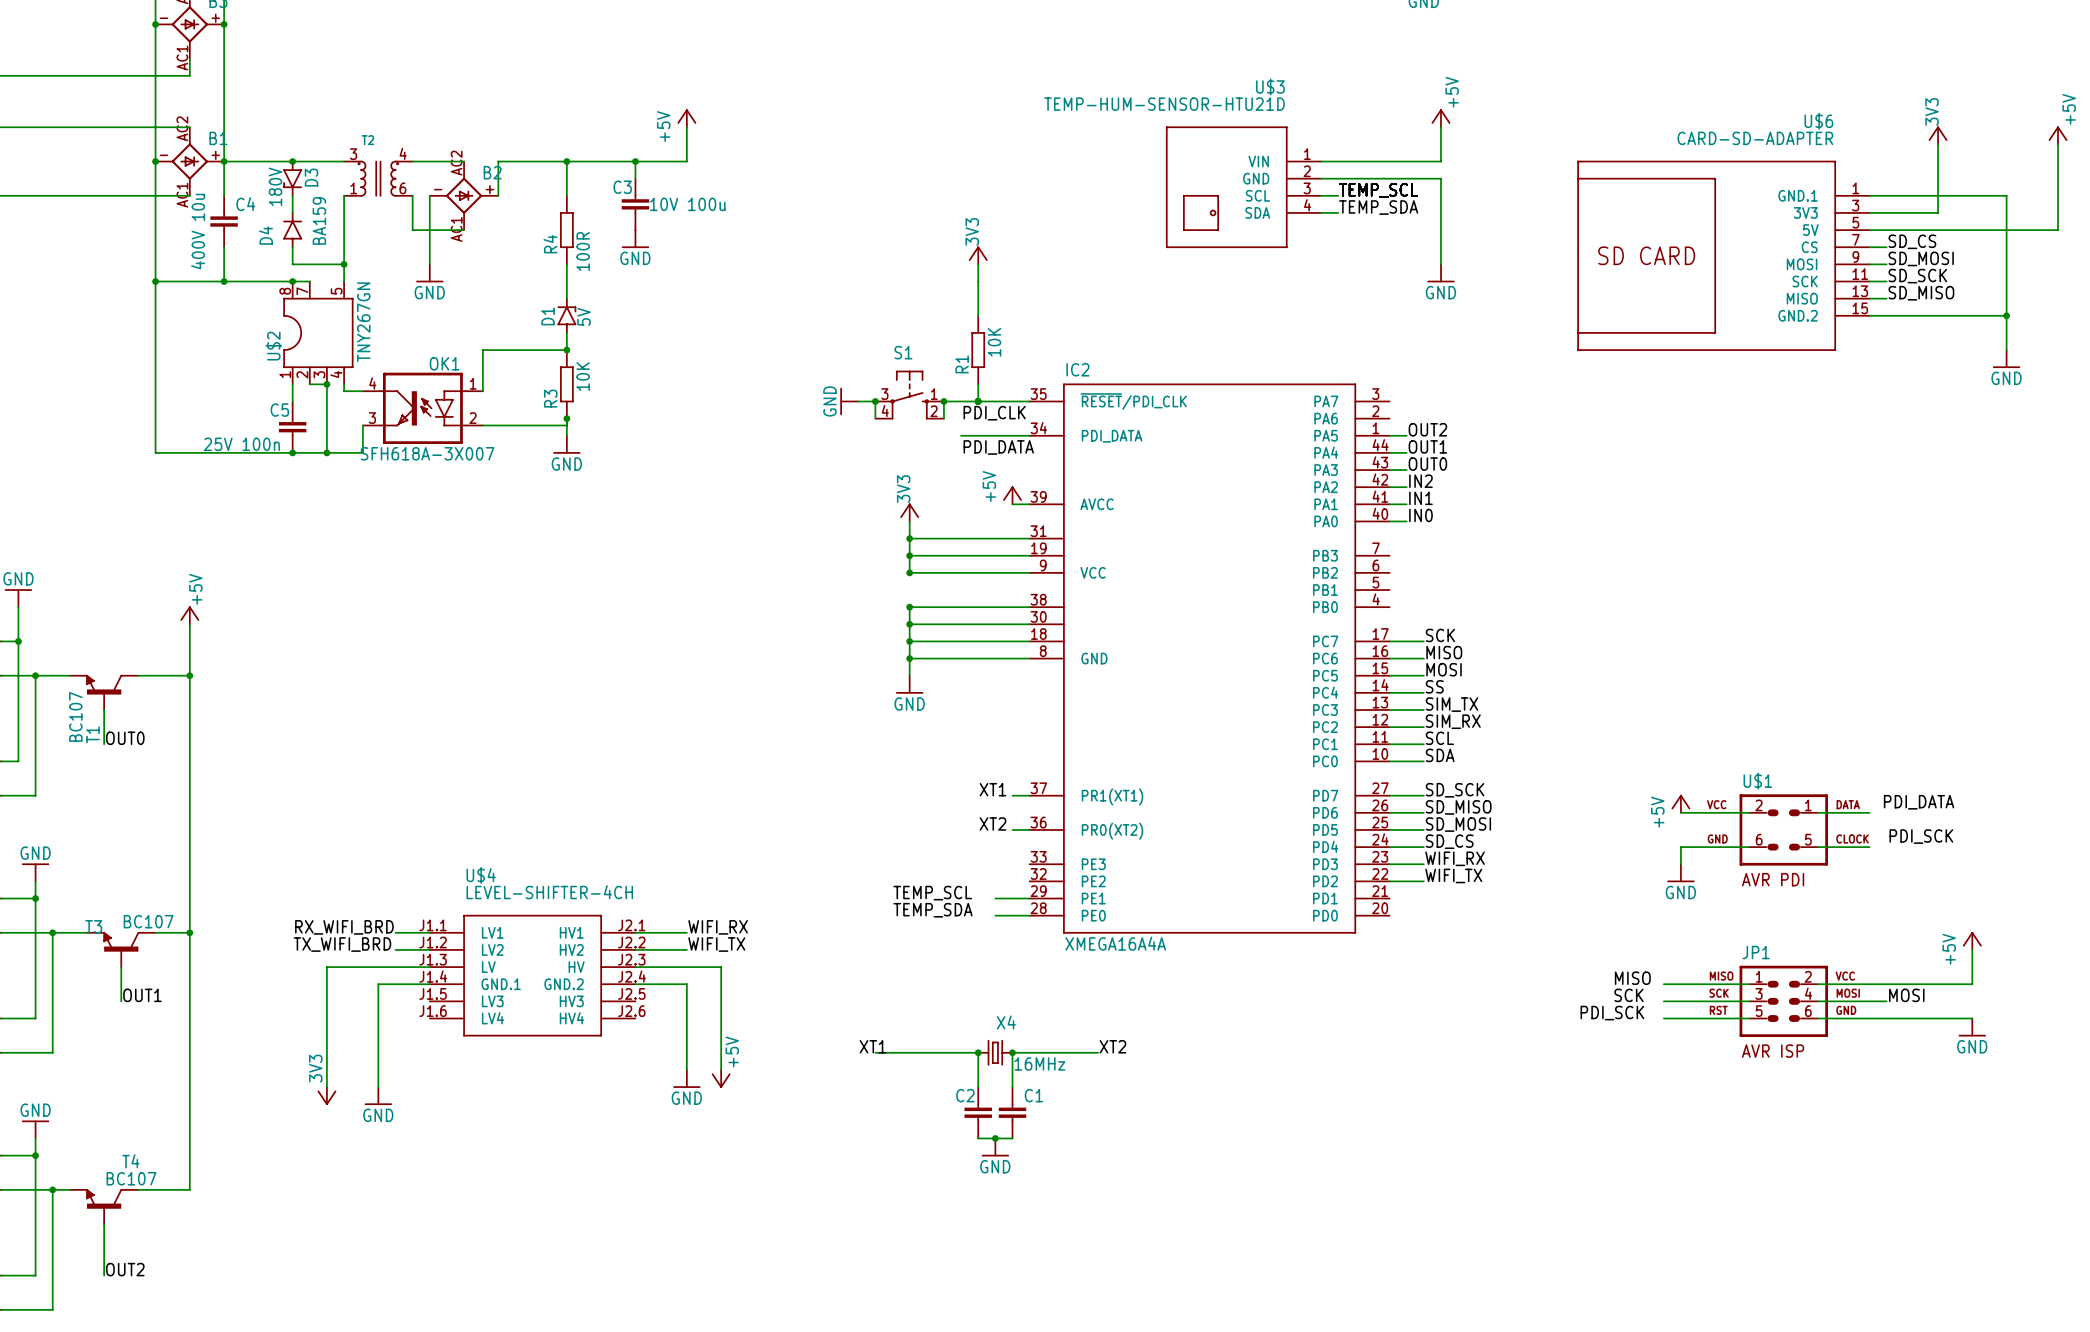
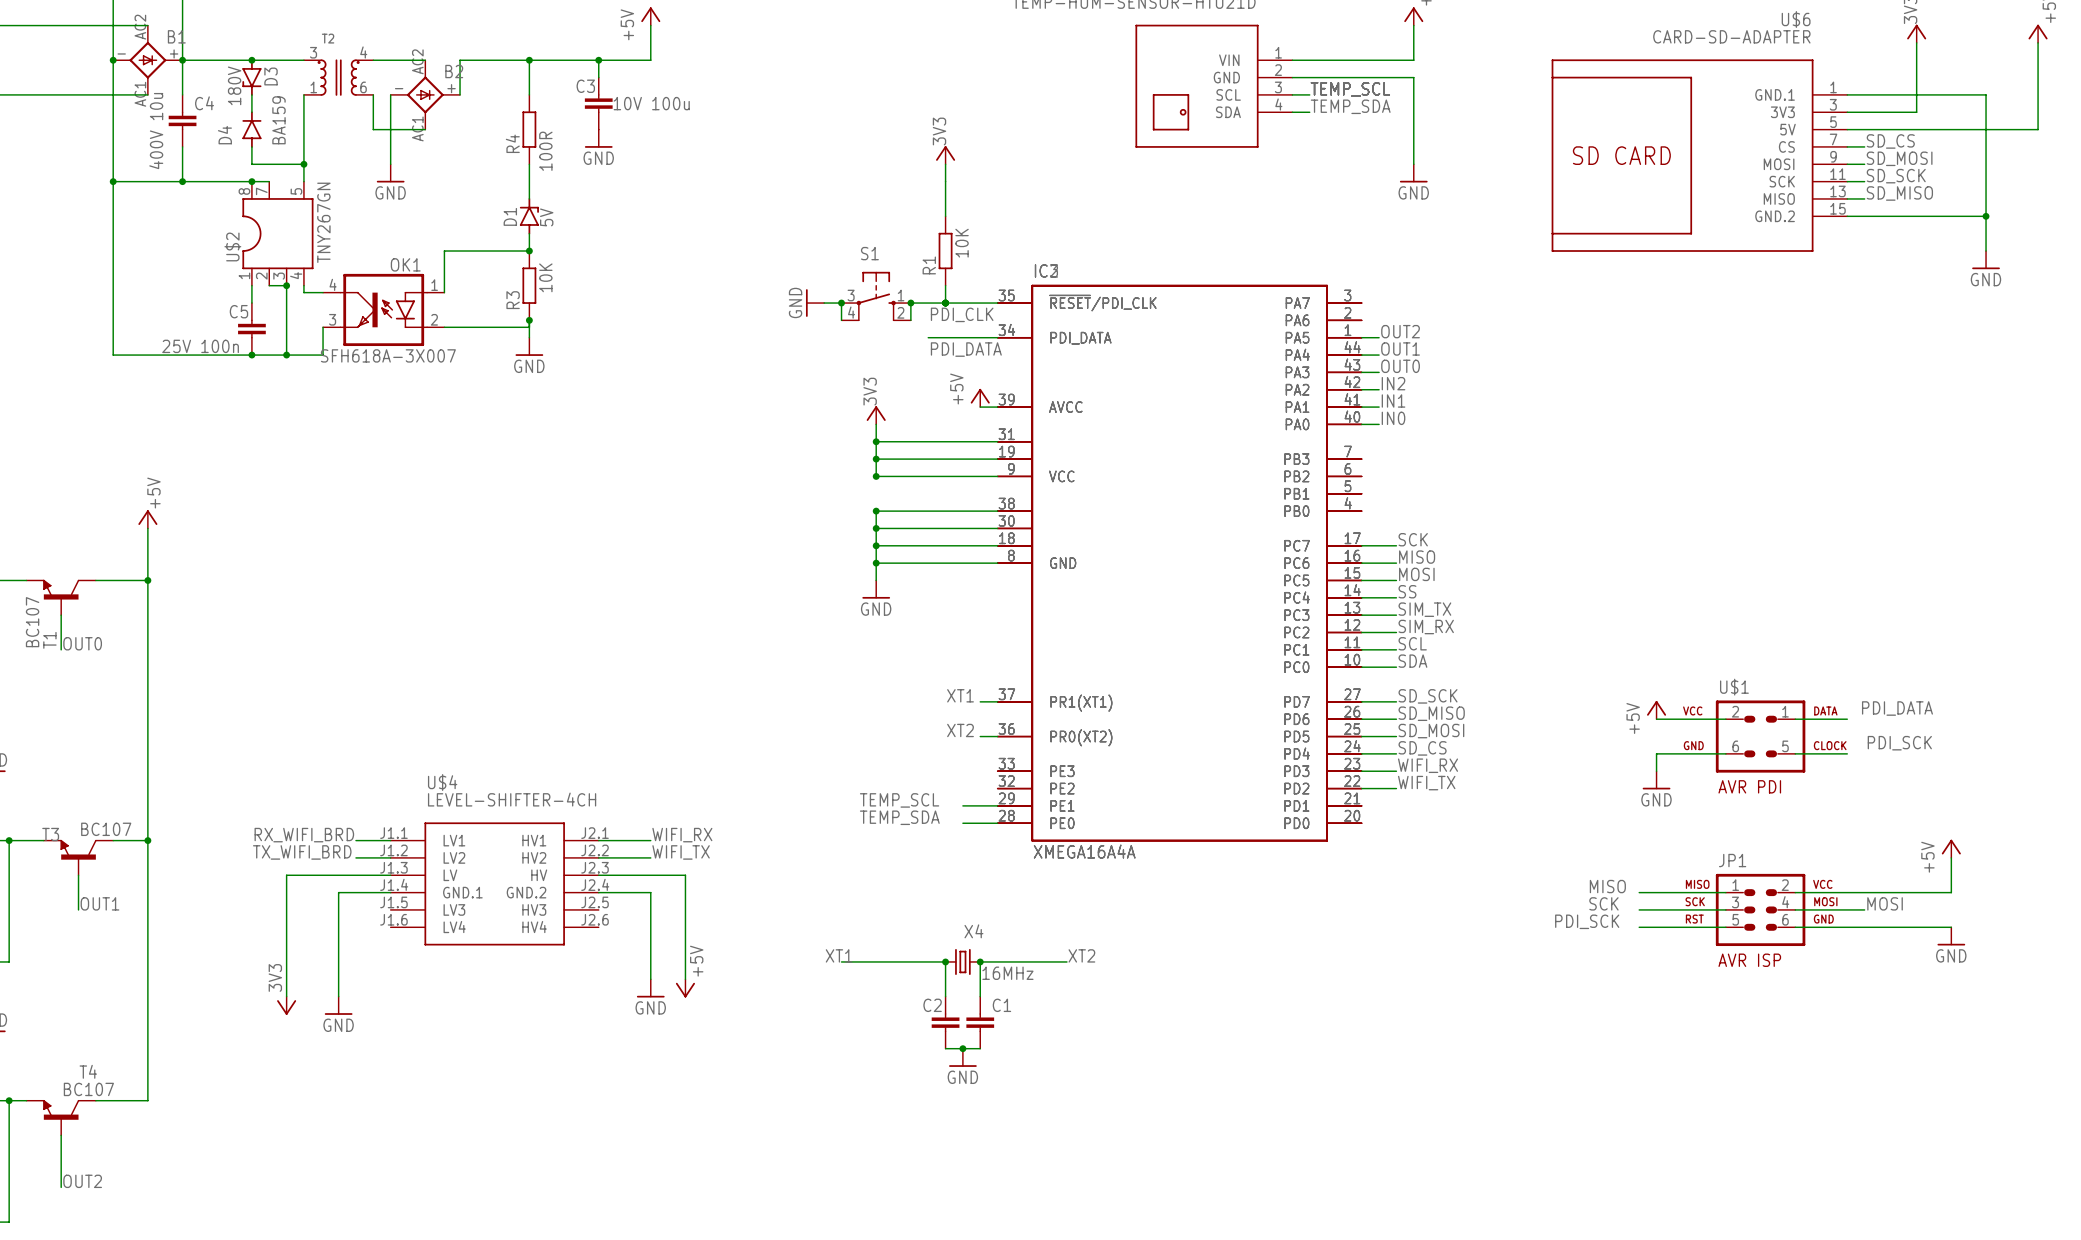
part: none -> XMEGA16A4A (1179, 563)

